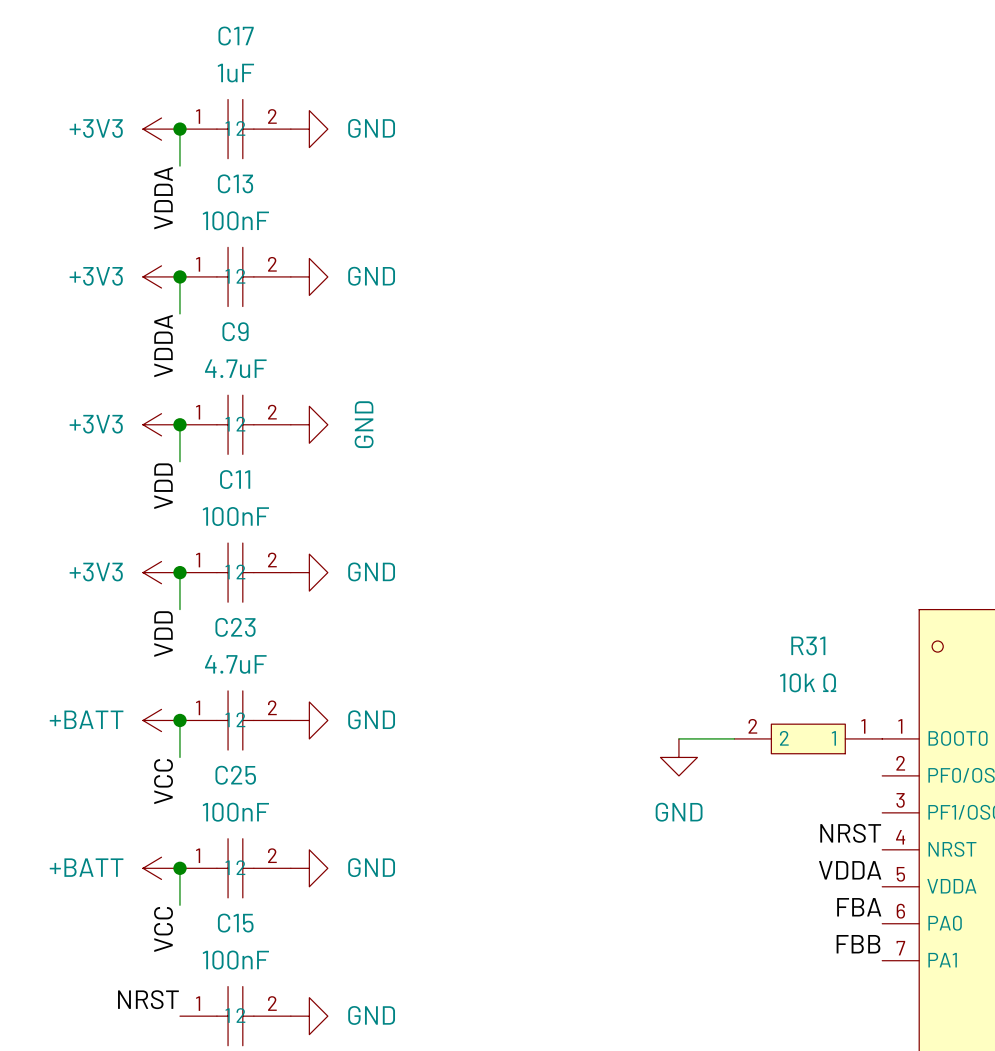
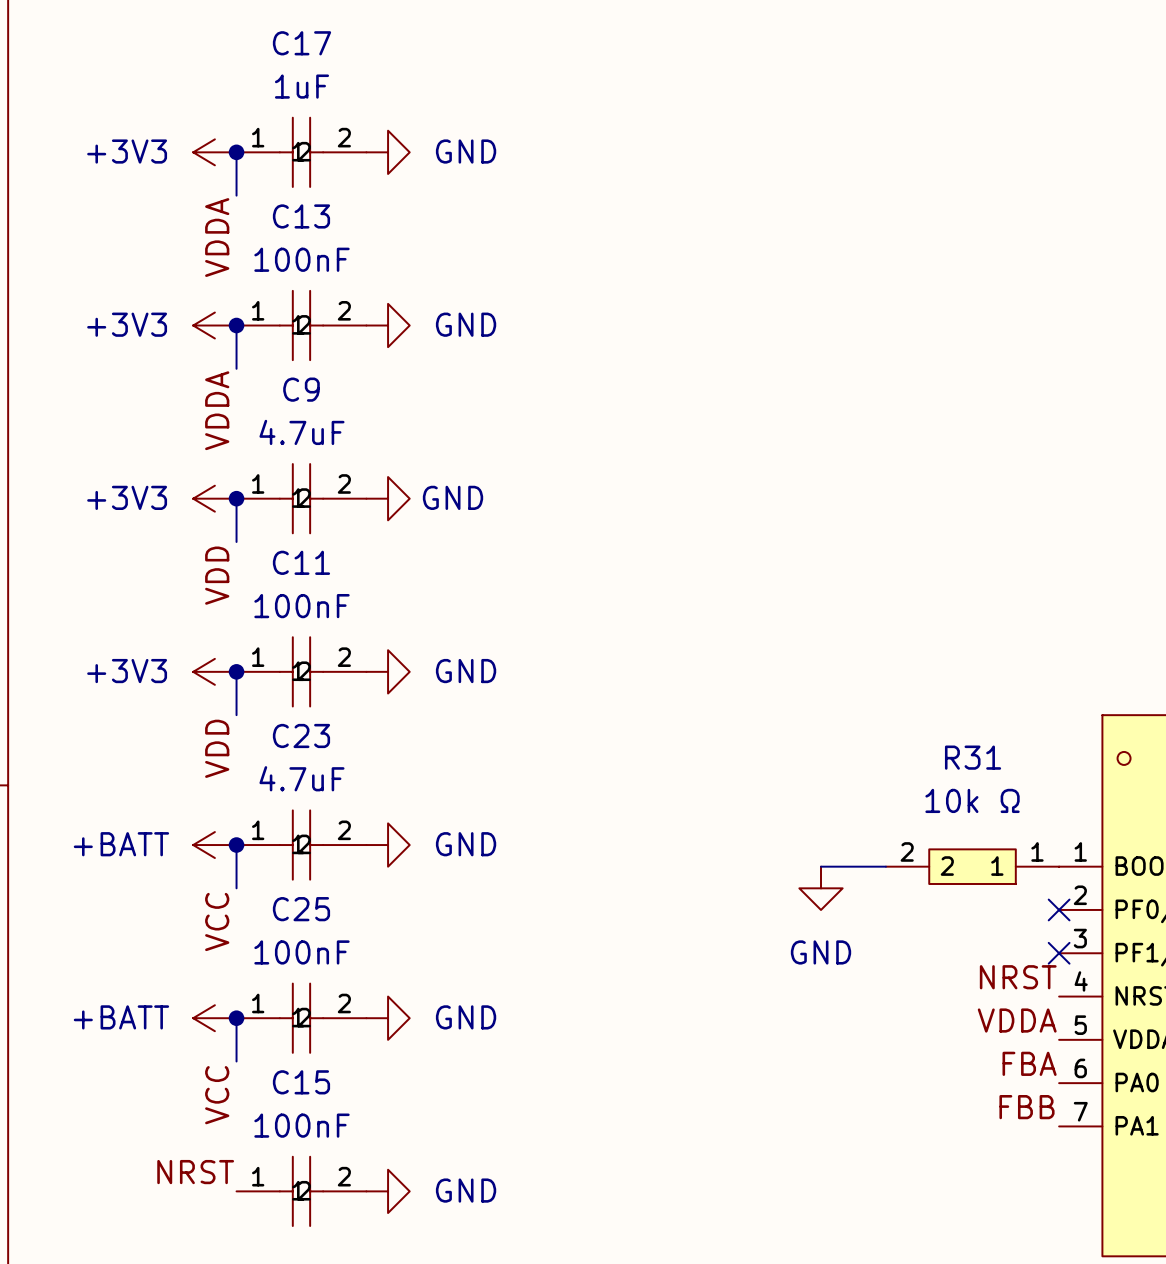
power symbol text rotation: 0° (364, 424) -> 90° clockwise (453, 497)
no-connect mark: none -> (1059, 909)
no-connect mark: none -> (1059, 953)

